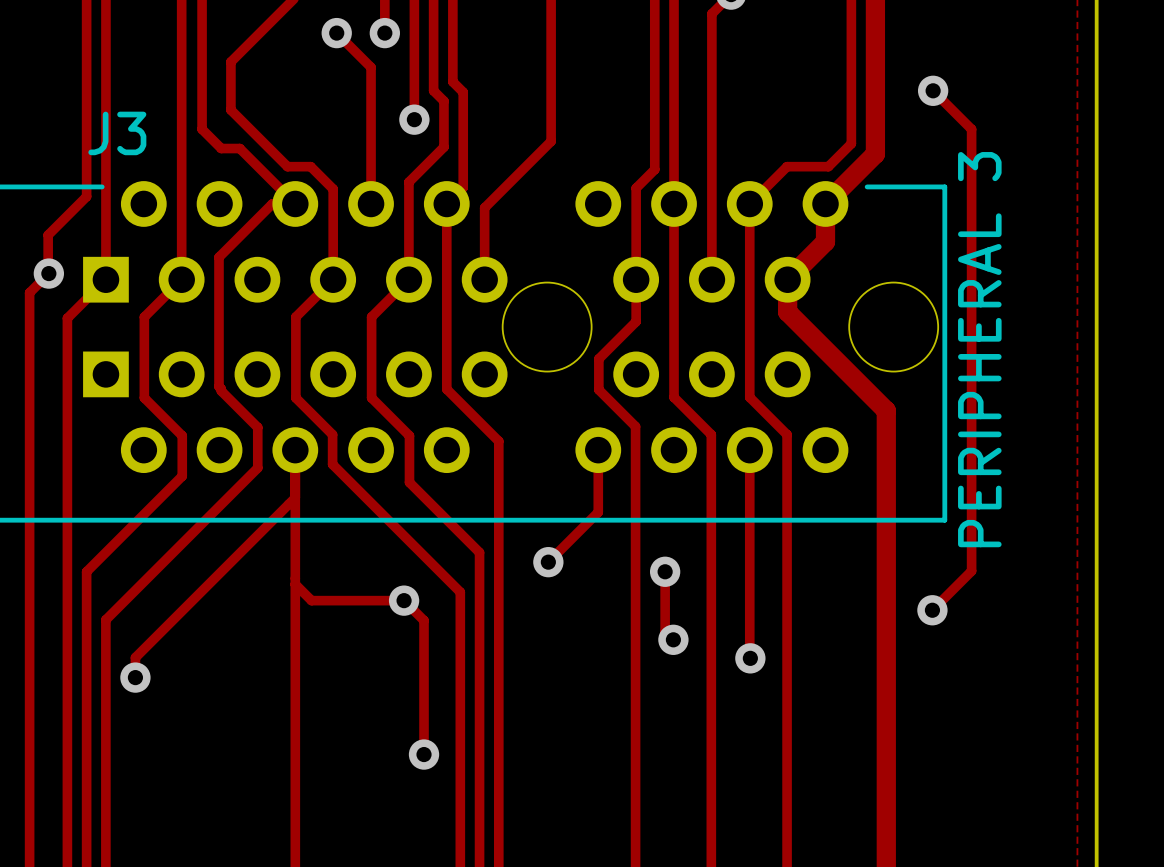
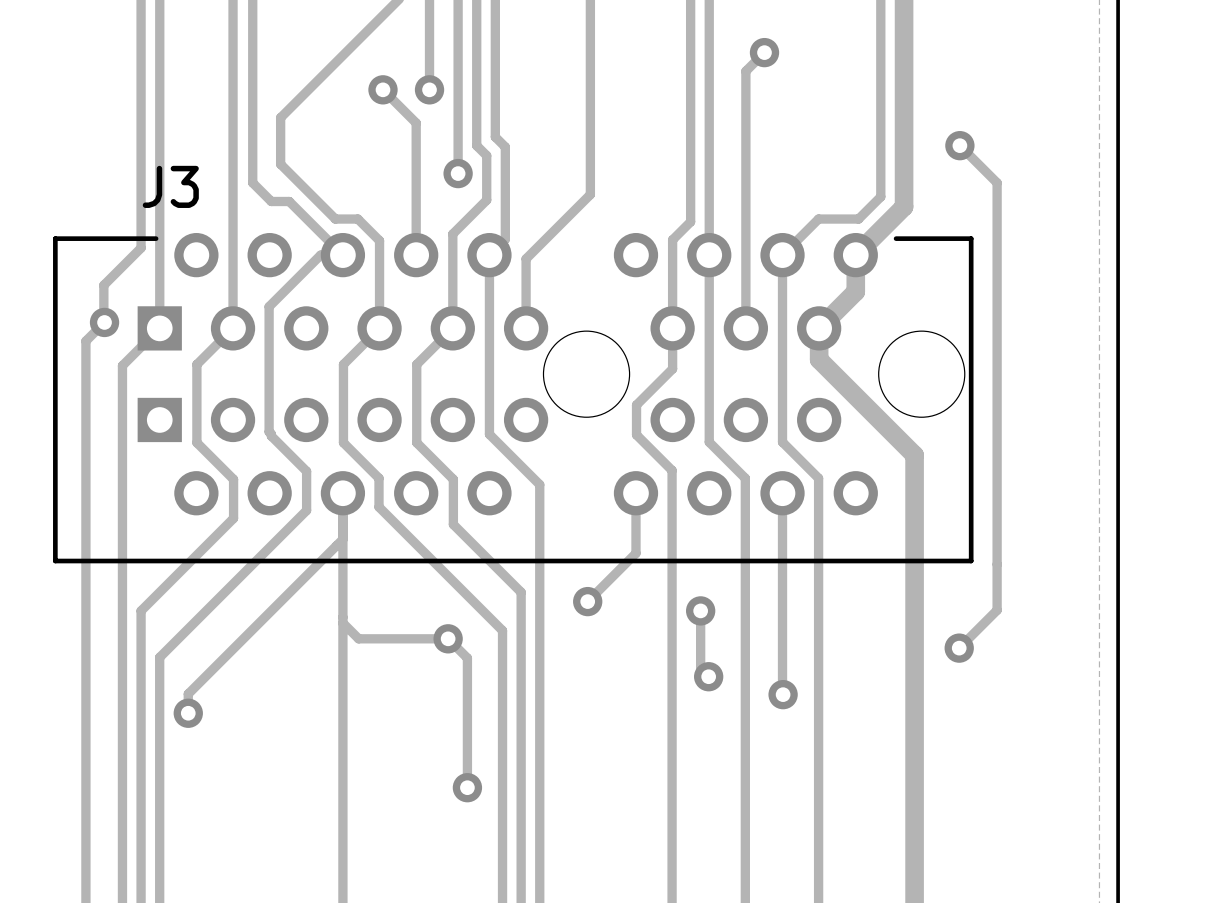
text: PERIPHERAL 3 (979, 349) -> none

